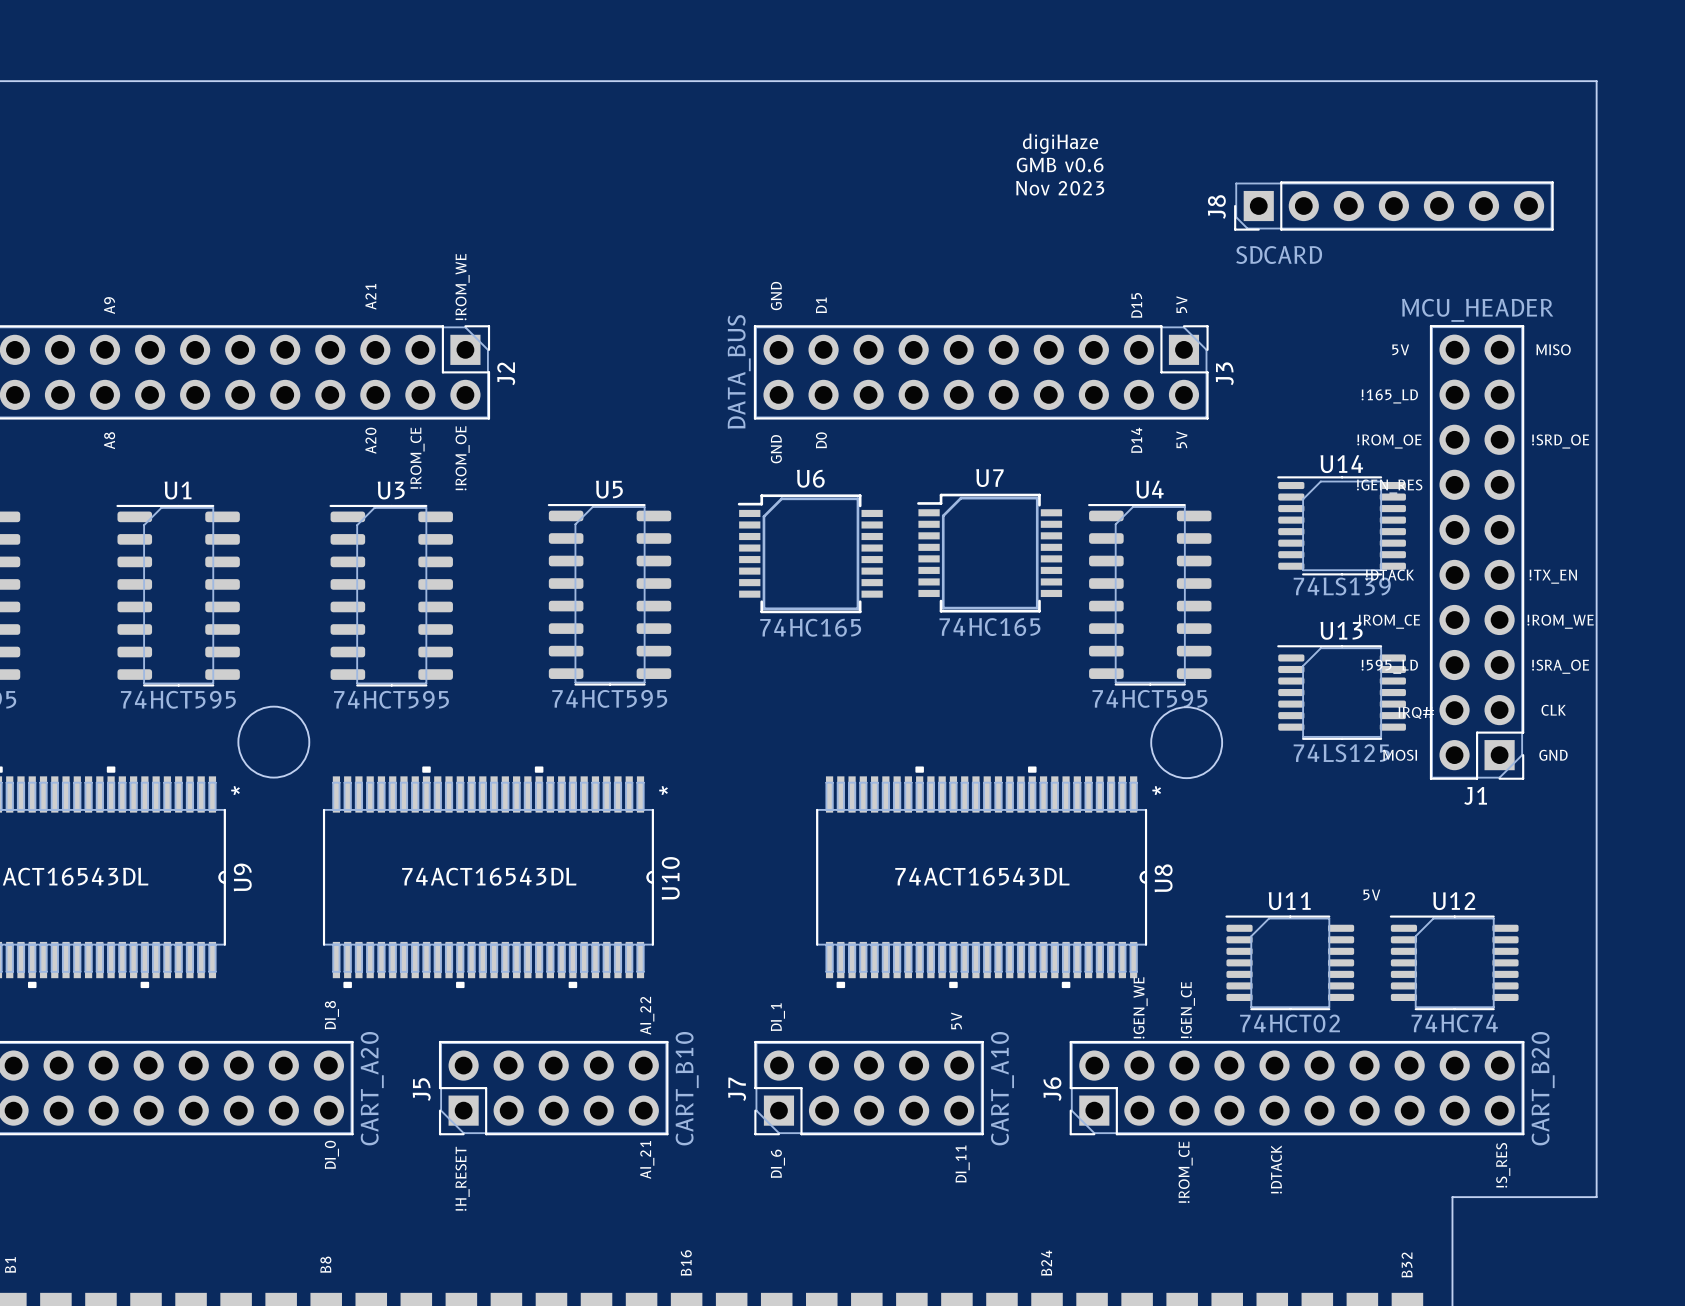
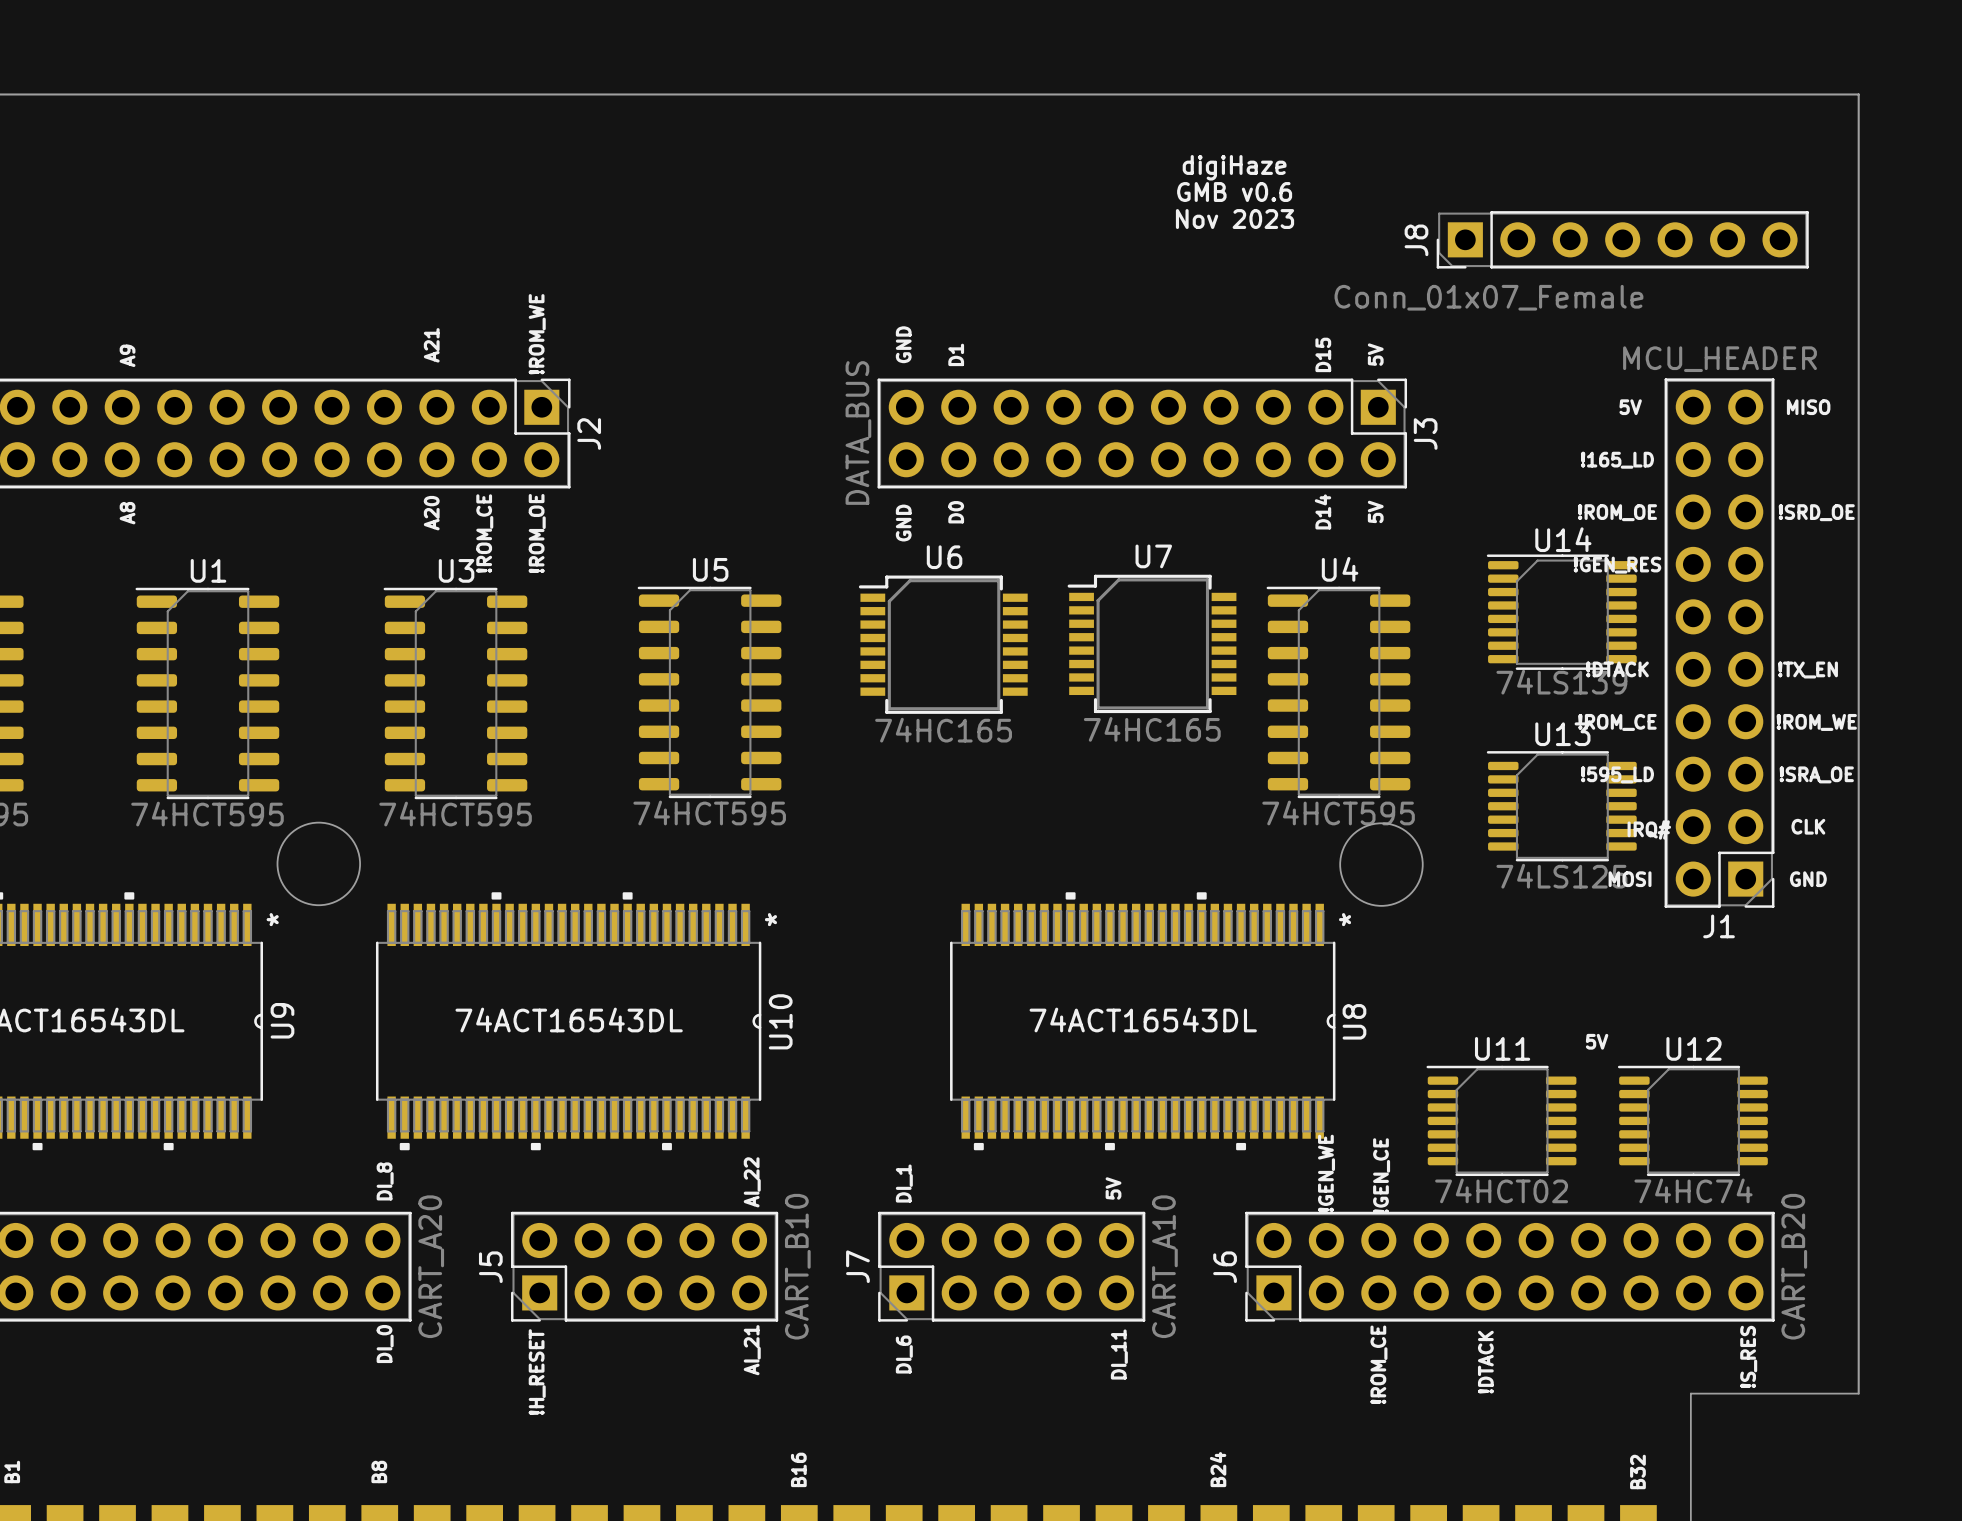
J8 value: SDCARD (1279, 255) -> Conn_01x07_Female (1488, 297)

